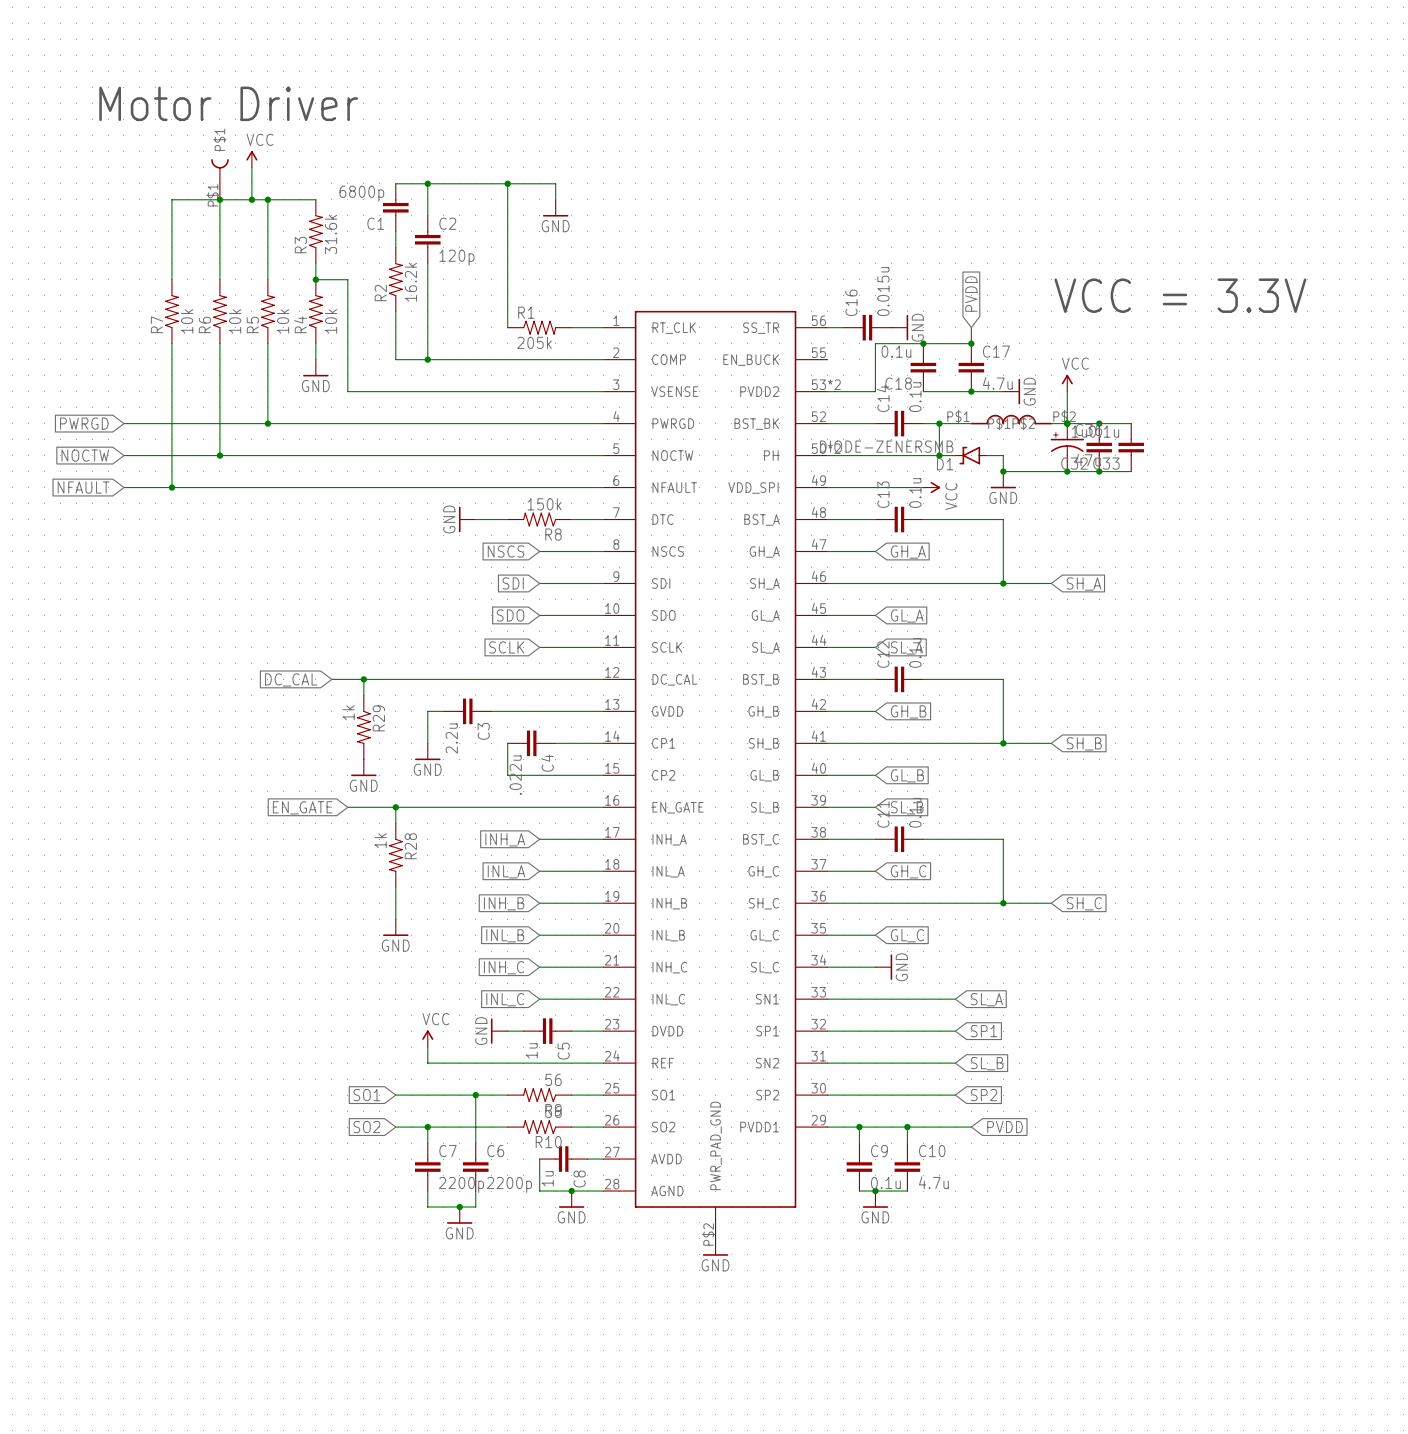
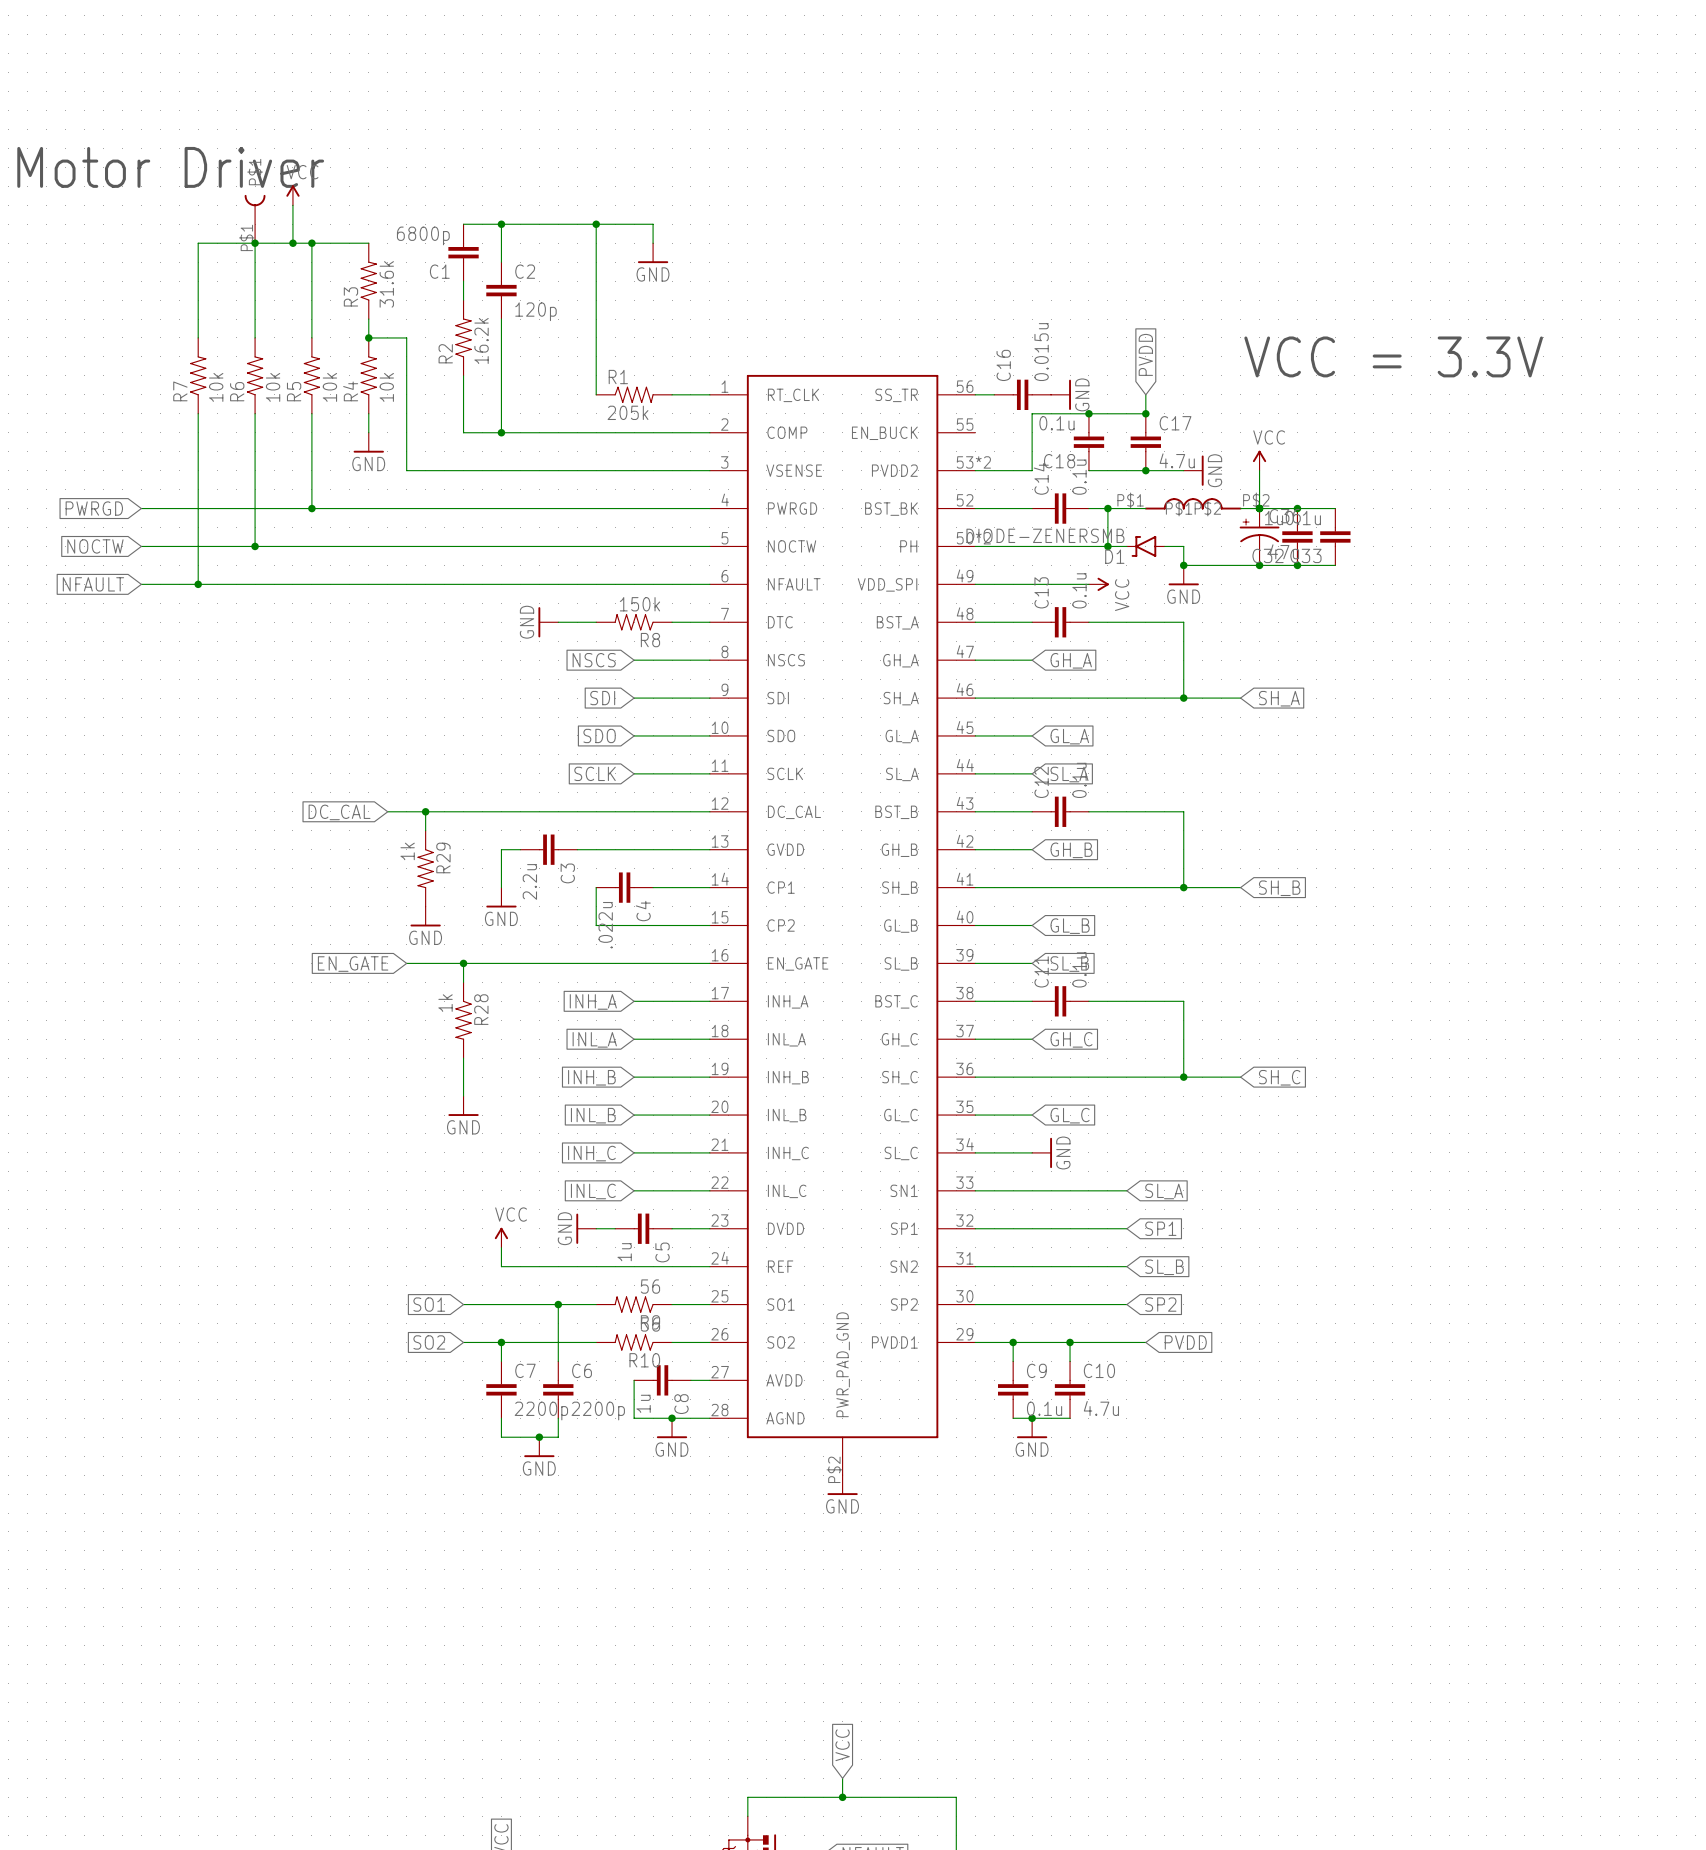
text position: Motor Driver (228, 103) -> Motor Driver (170, 167)

